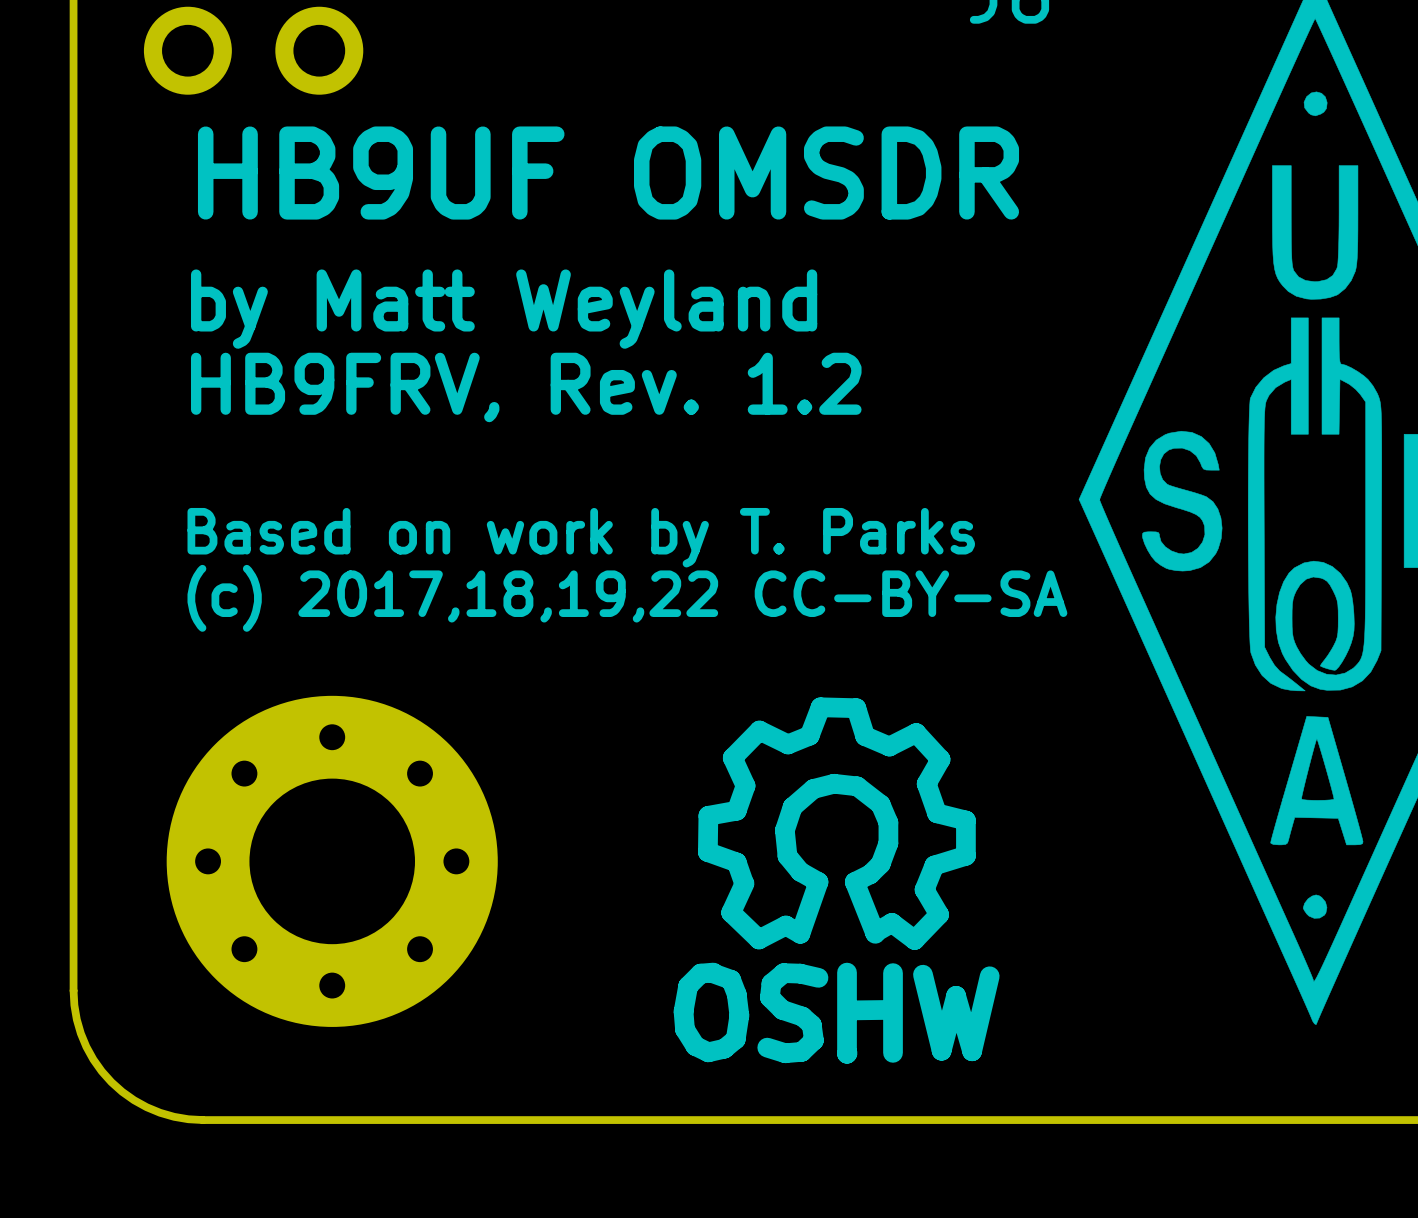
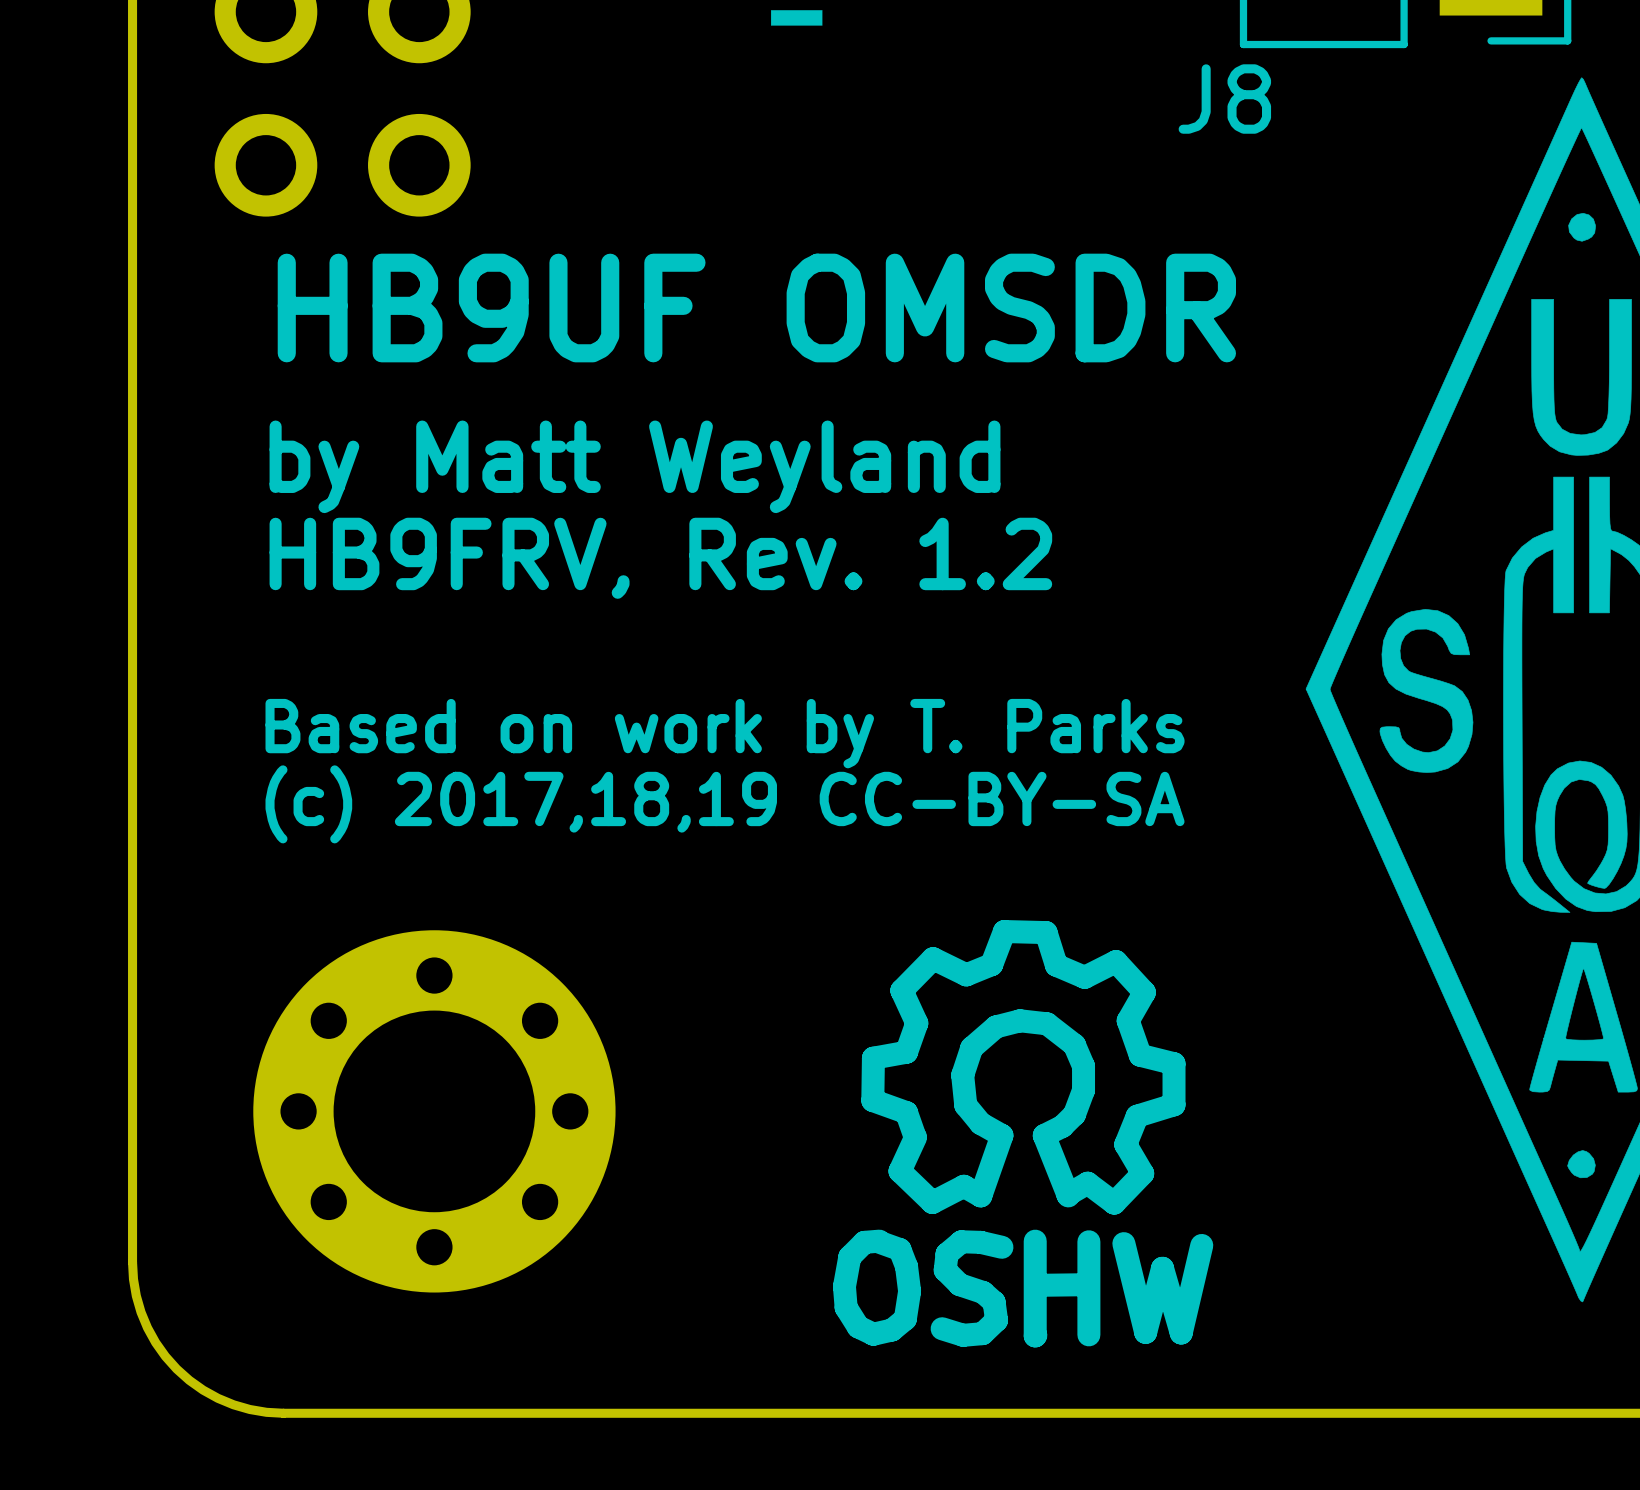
text: (c) 2017,18,19,22 CC-BY-SA (627, 598) -> (c) 2017,18,19 CC-BY-SA (725, 804)
part footprint: [166, 695, 498, 1027] -> [253, 930, 616, 1293]

